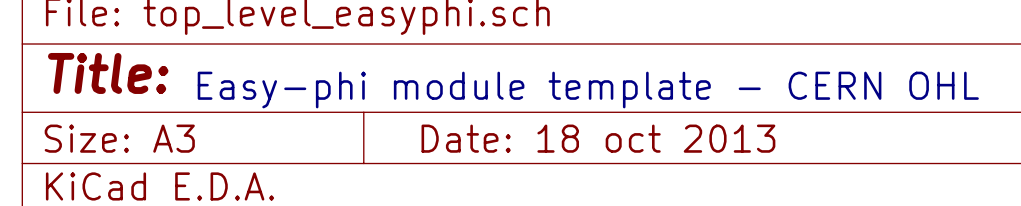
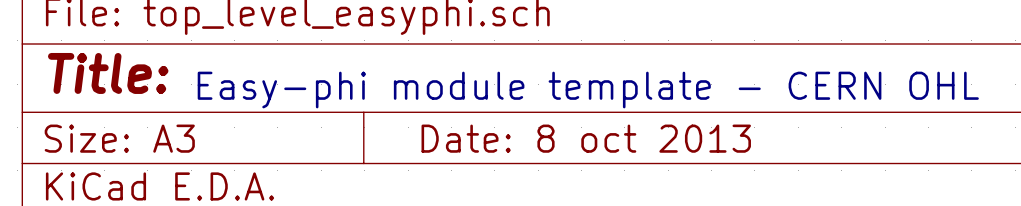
title block: Date: 18 oct 2013 (598, 138) -> Date: 8 oct 2013 (586, 138)

